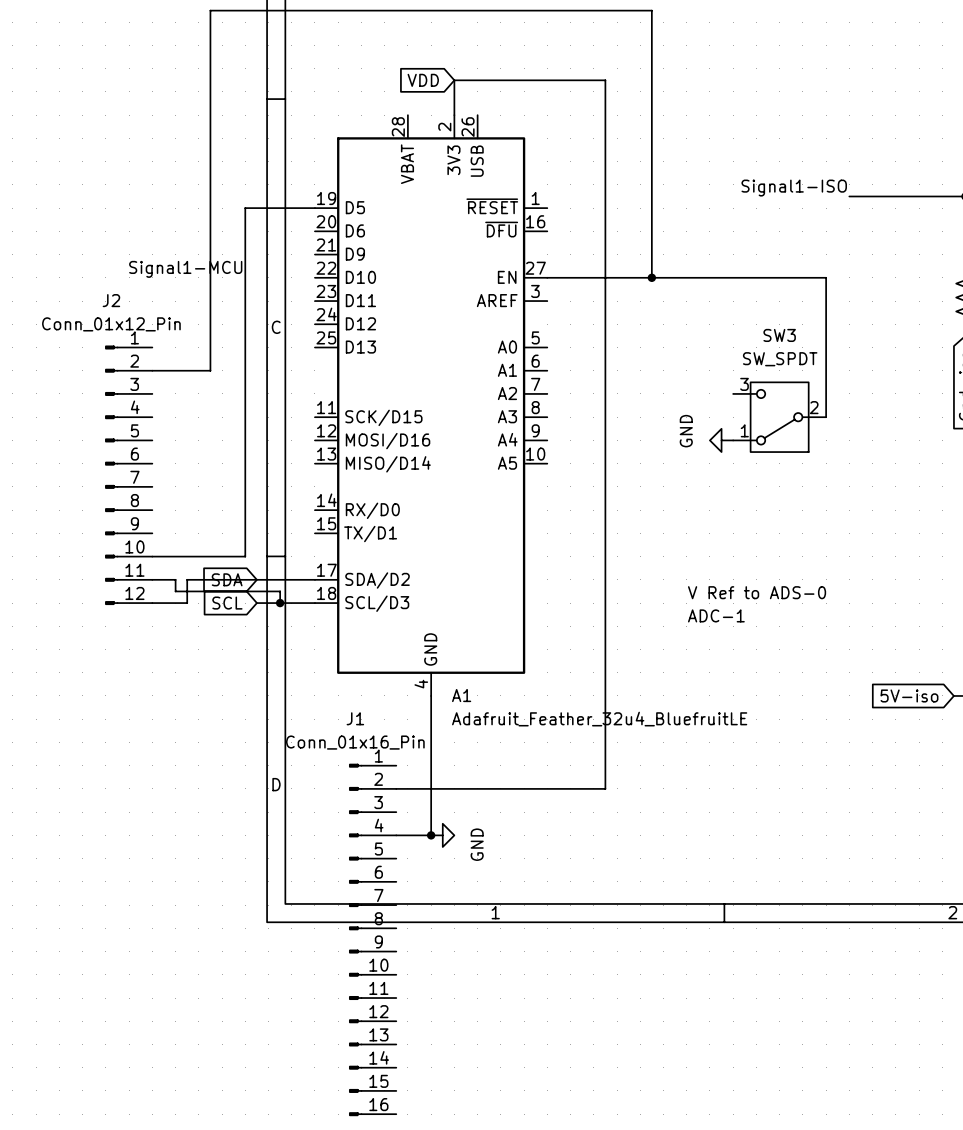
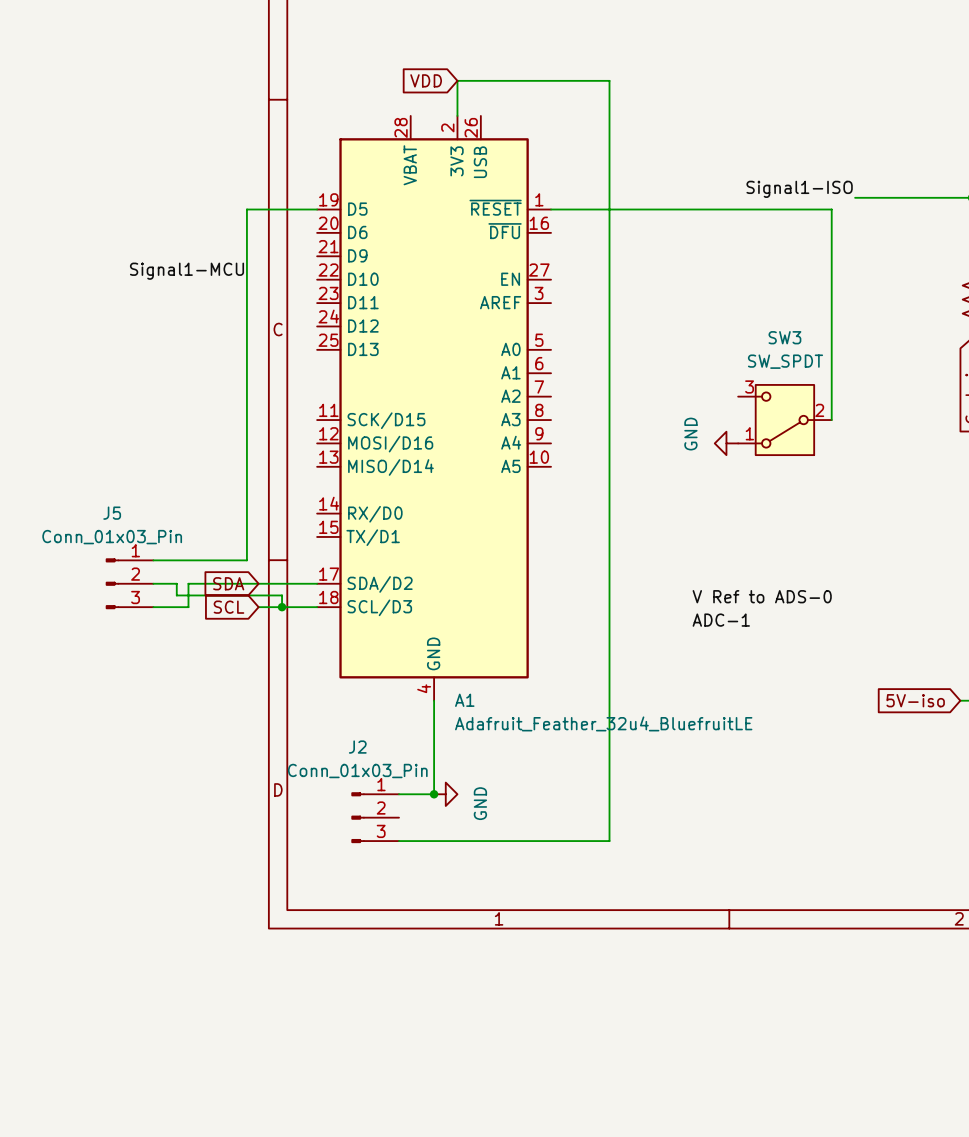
wire: (547, 277) (826, 277) -> (551, 209) (831, 209) (831, 279)
wire: (651, 277) (651, 10) (210, 10) (210, 370) (152, 370) -> none
junction: (651, 277) -> none
J2 name position: J2 (111, 300) -> J2 (357, 747)
J2 value: Conn_01x12_Pin (111, 324) -> Conn_01x03_Pin (357, 771)
J2 symbol: [105, 345, 153, 605] -> [351, 792, 399, 843]
J5: none -> Conn_01x03_Pin (129, 583)
wire: (605, 788) (431, 788) (431, 835) -> (609, 794) (609, 841) (434, 841)
junction position: (431, 835) -> (434, 794)
power symbol position: GND (442, 835) -> GND (445, 794)
J1: Conn_01x16_Pin (372, 939) -> none

